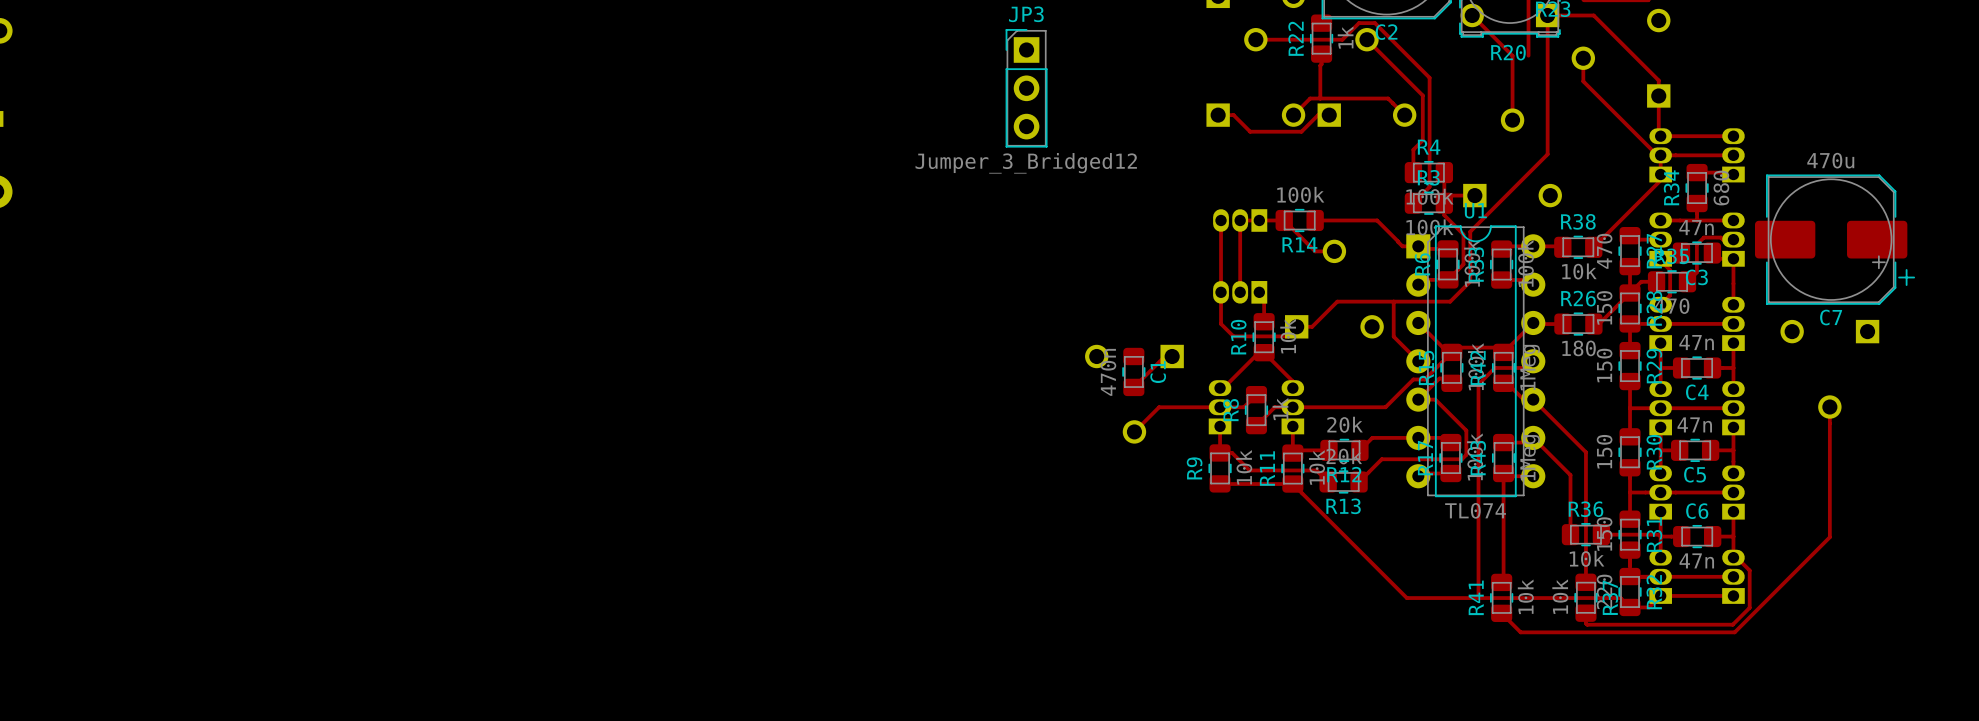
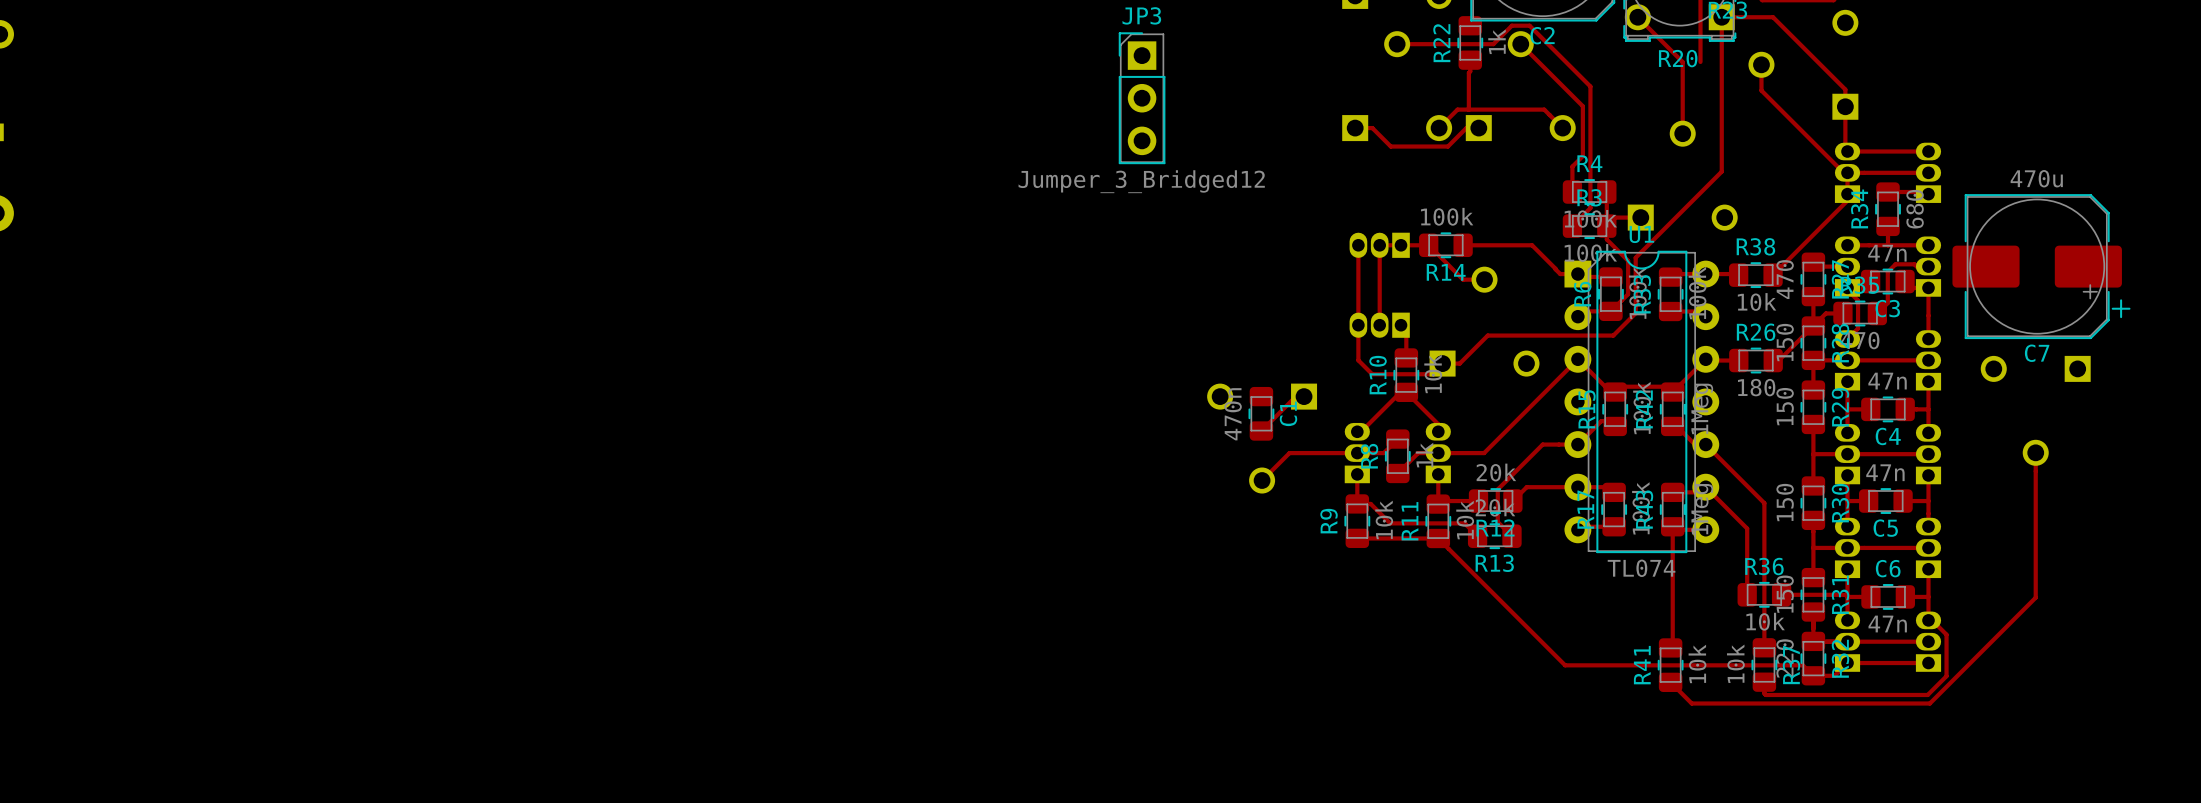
track: (1393, 301) (1393, 336) (1418, 361) -> none
track: (1451, 352) (1424, 379) (1413, 379) (1385, 407) (1334, 407) -> (1577, 359) (1484, 453)
track: (1533, 361) (1526, 367) (1494, 367) (1478, 384) (1478, 598) -> none
track: (1418, 399) (1435, 399) (1466, 430) (1466, 454) (1461, 459) (1381, 459) (1359, 481) -> (1577, 444) (1542, 444) (1497, 489) (1497, 522) (1511, 536)

